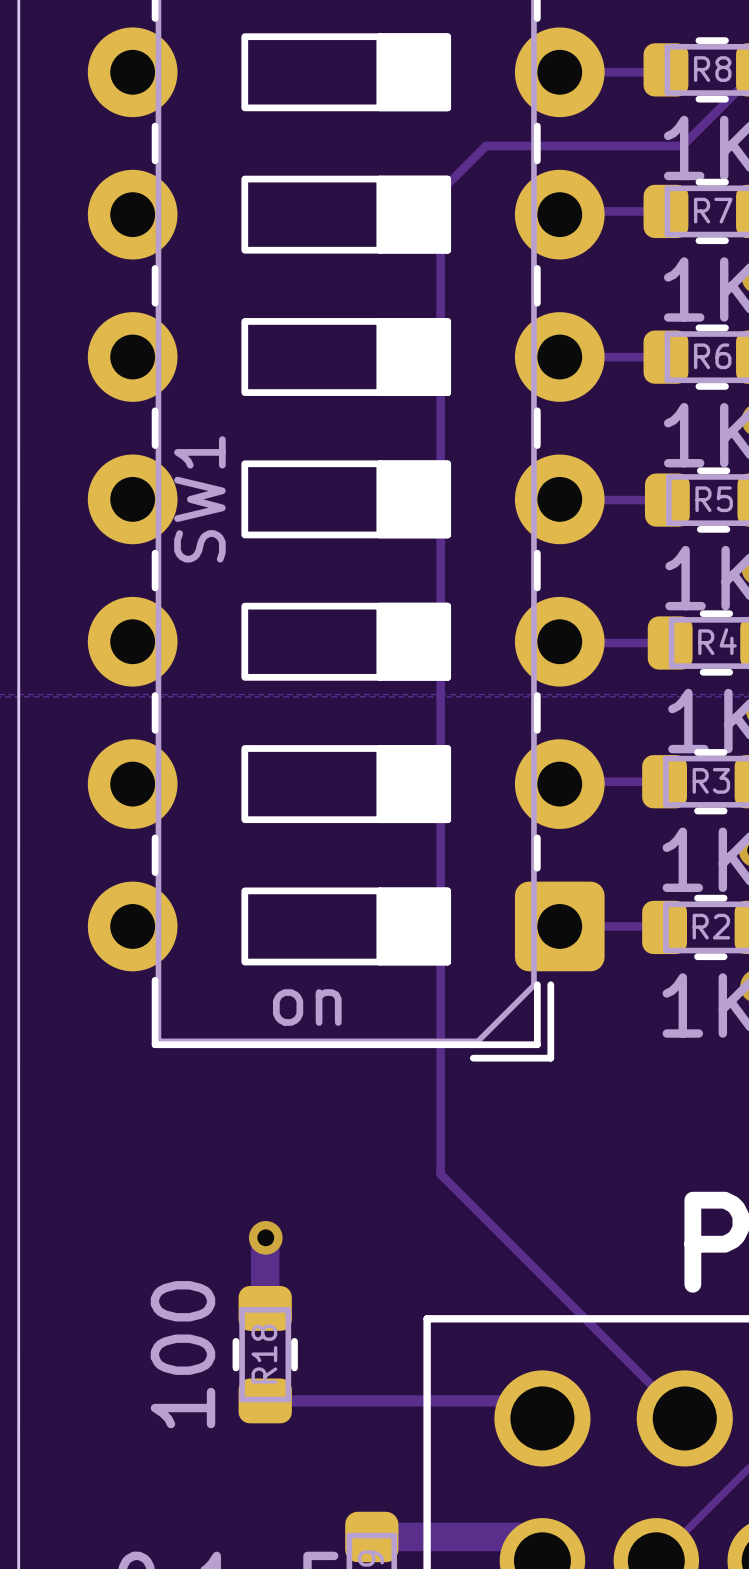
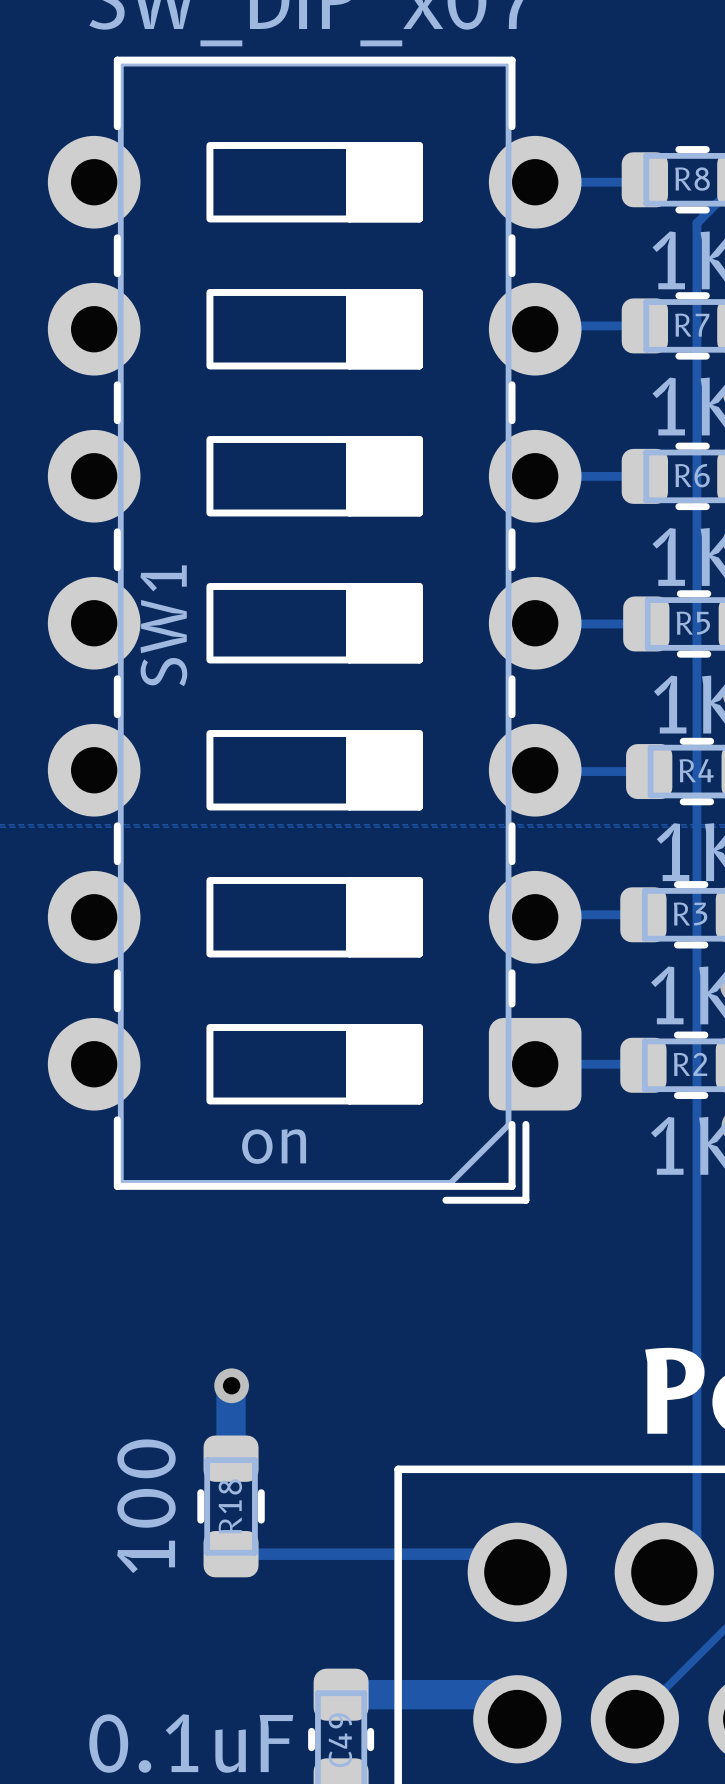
track: (716, 111) (682, 145) (486, 145) (440, 191) (440, 1174) (684, 1418) -> (696, 223) (696, 1539) (664, 1572)

